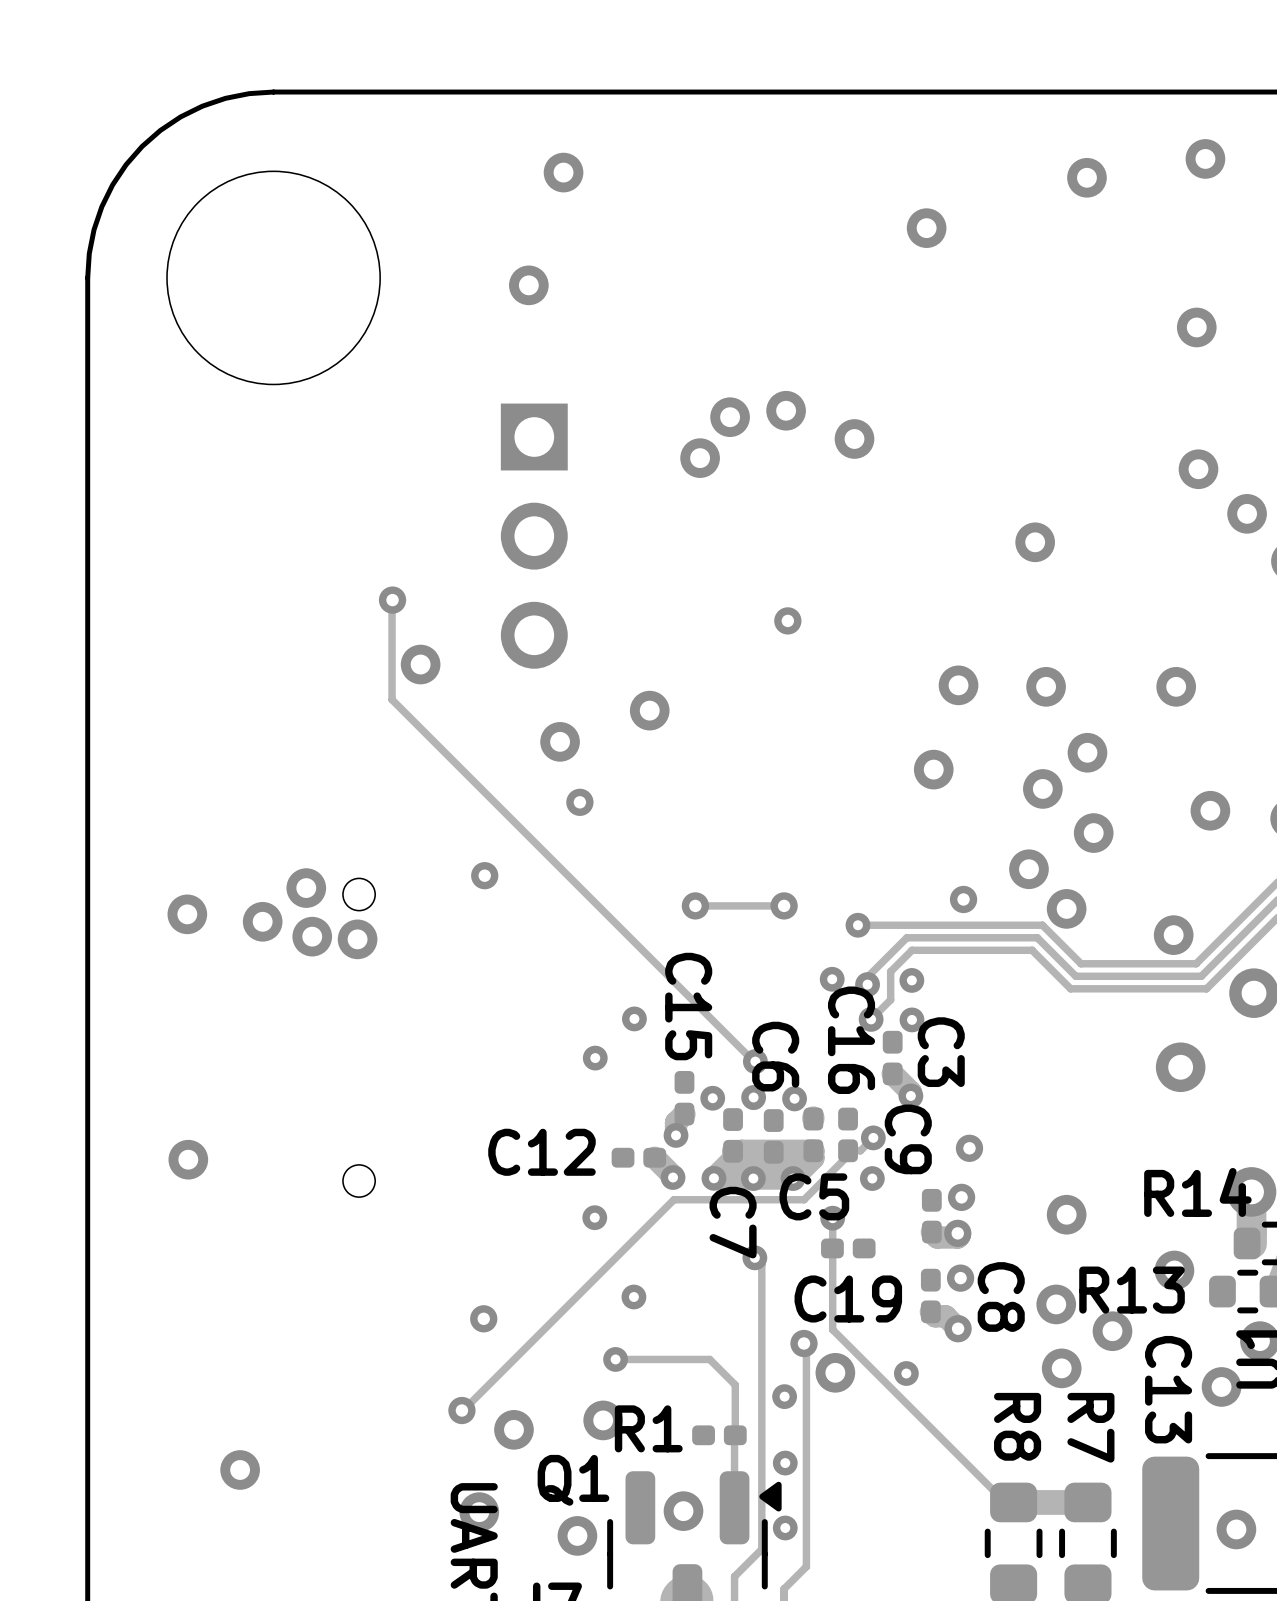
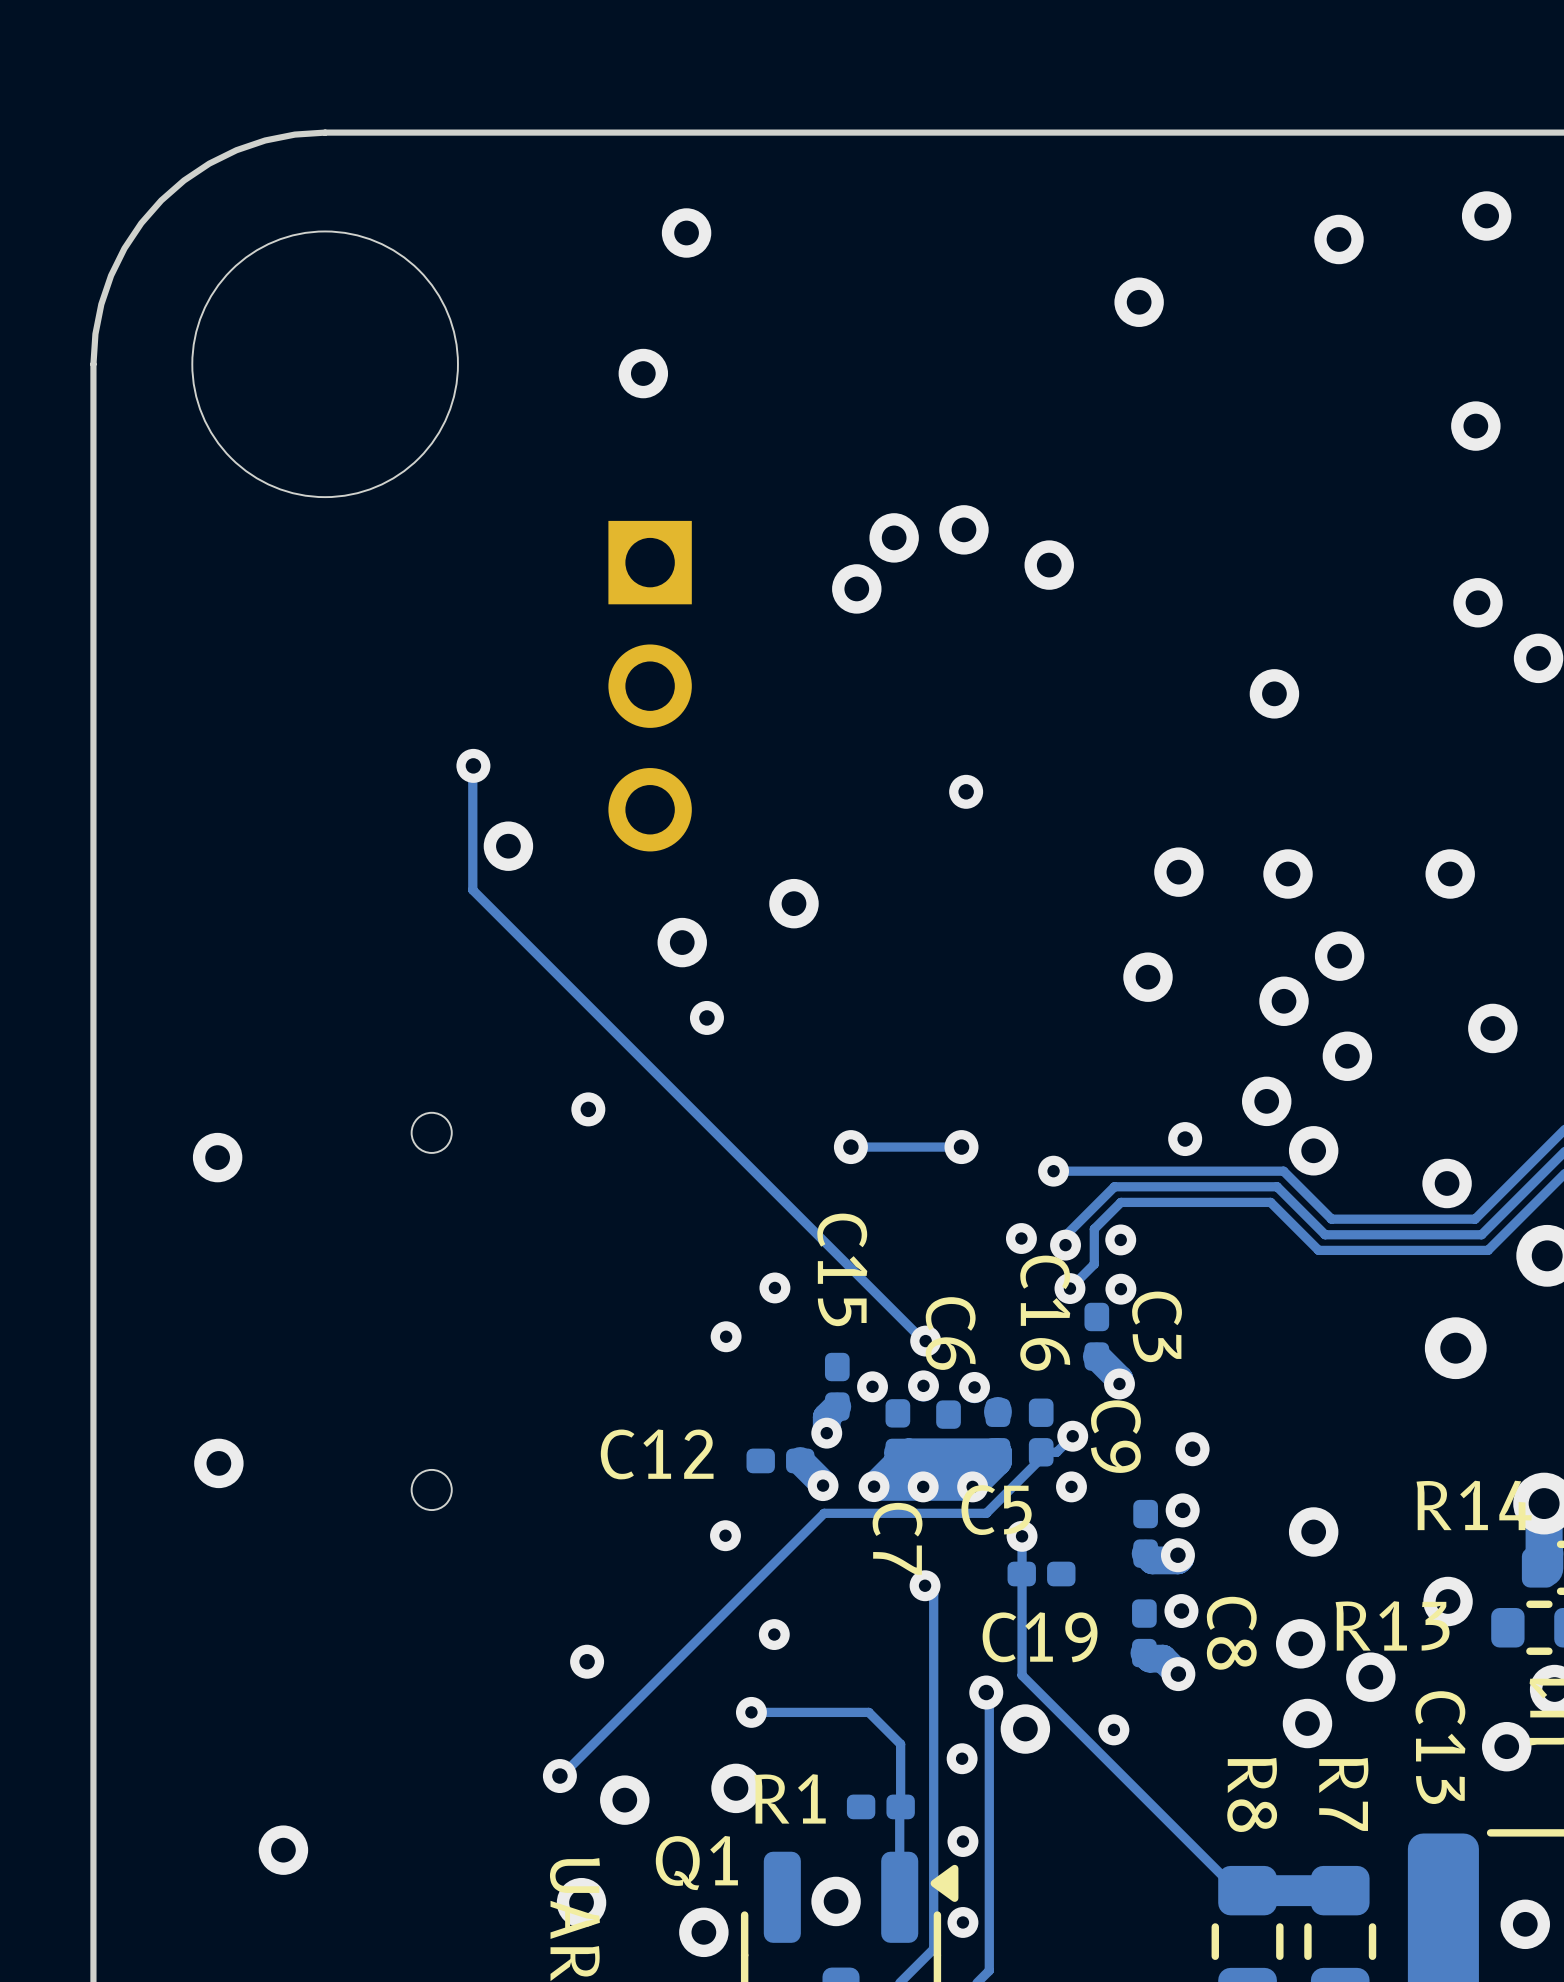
via: (306, 888) -> none
via: (262, 921) -> none
via: (312, 936) -> none
via: (357, 939) -> none

